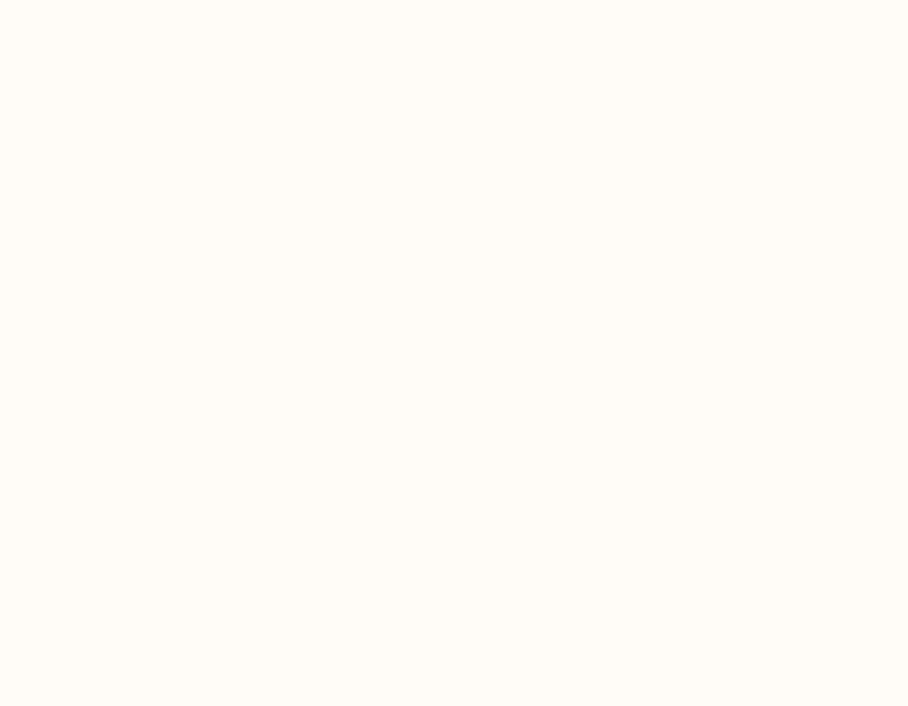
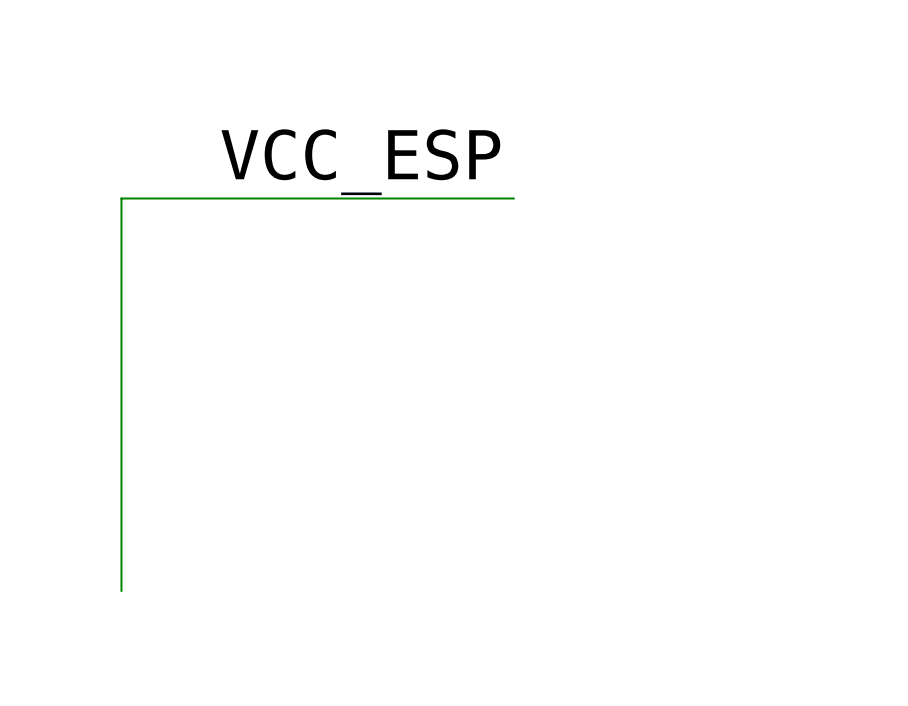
label: none -> VCC_ESP (360, 162)
wire: none -> (514, 198) (121, 198) (121, 591)

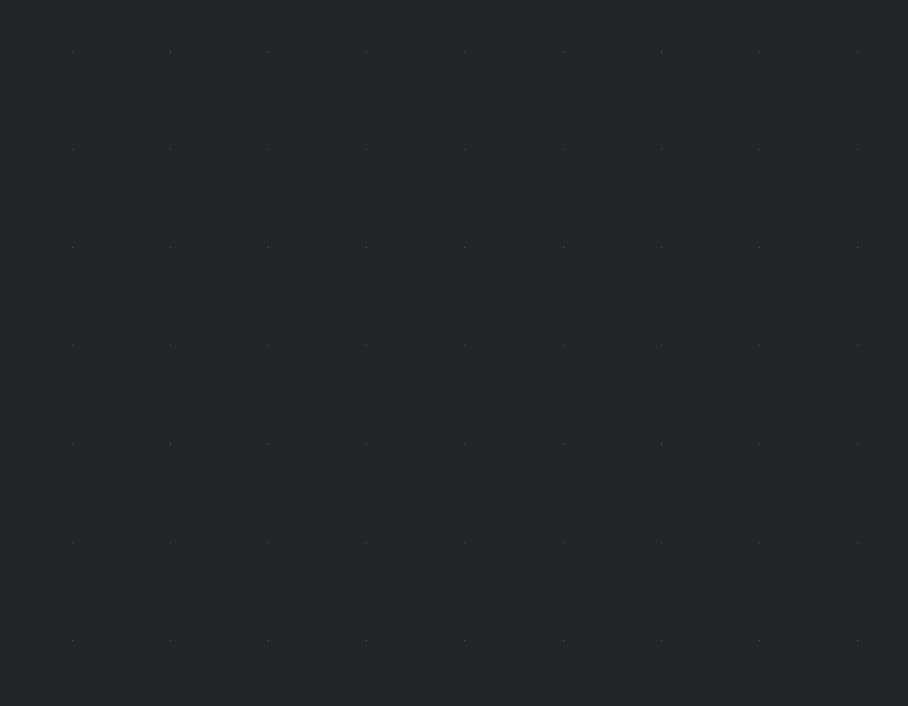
label: VCC_ESP (360, 162) -> none
wire: (514, 198) (121, 198) (121, 591) -> none

